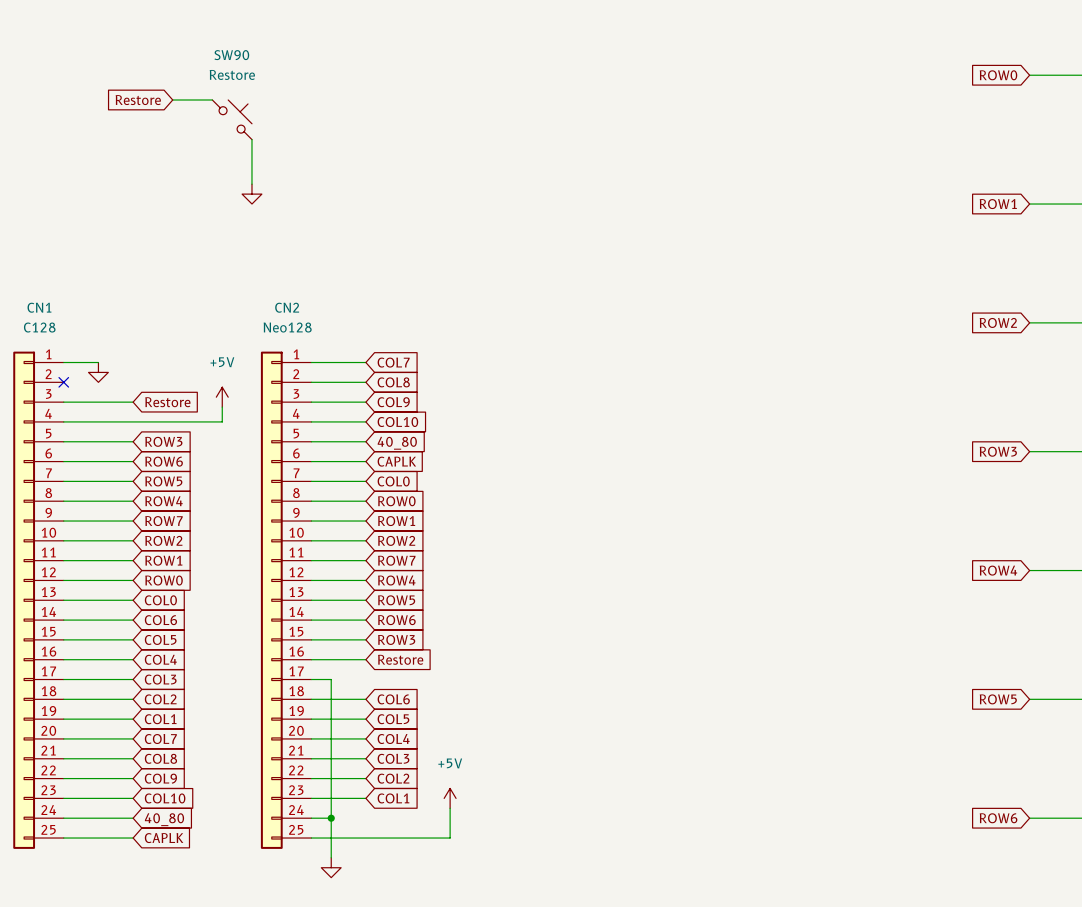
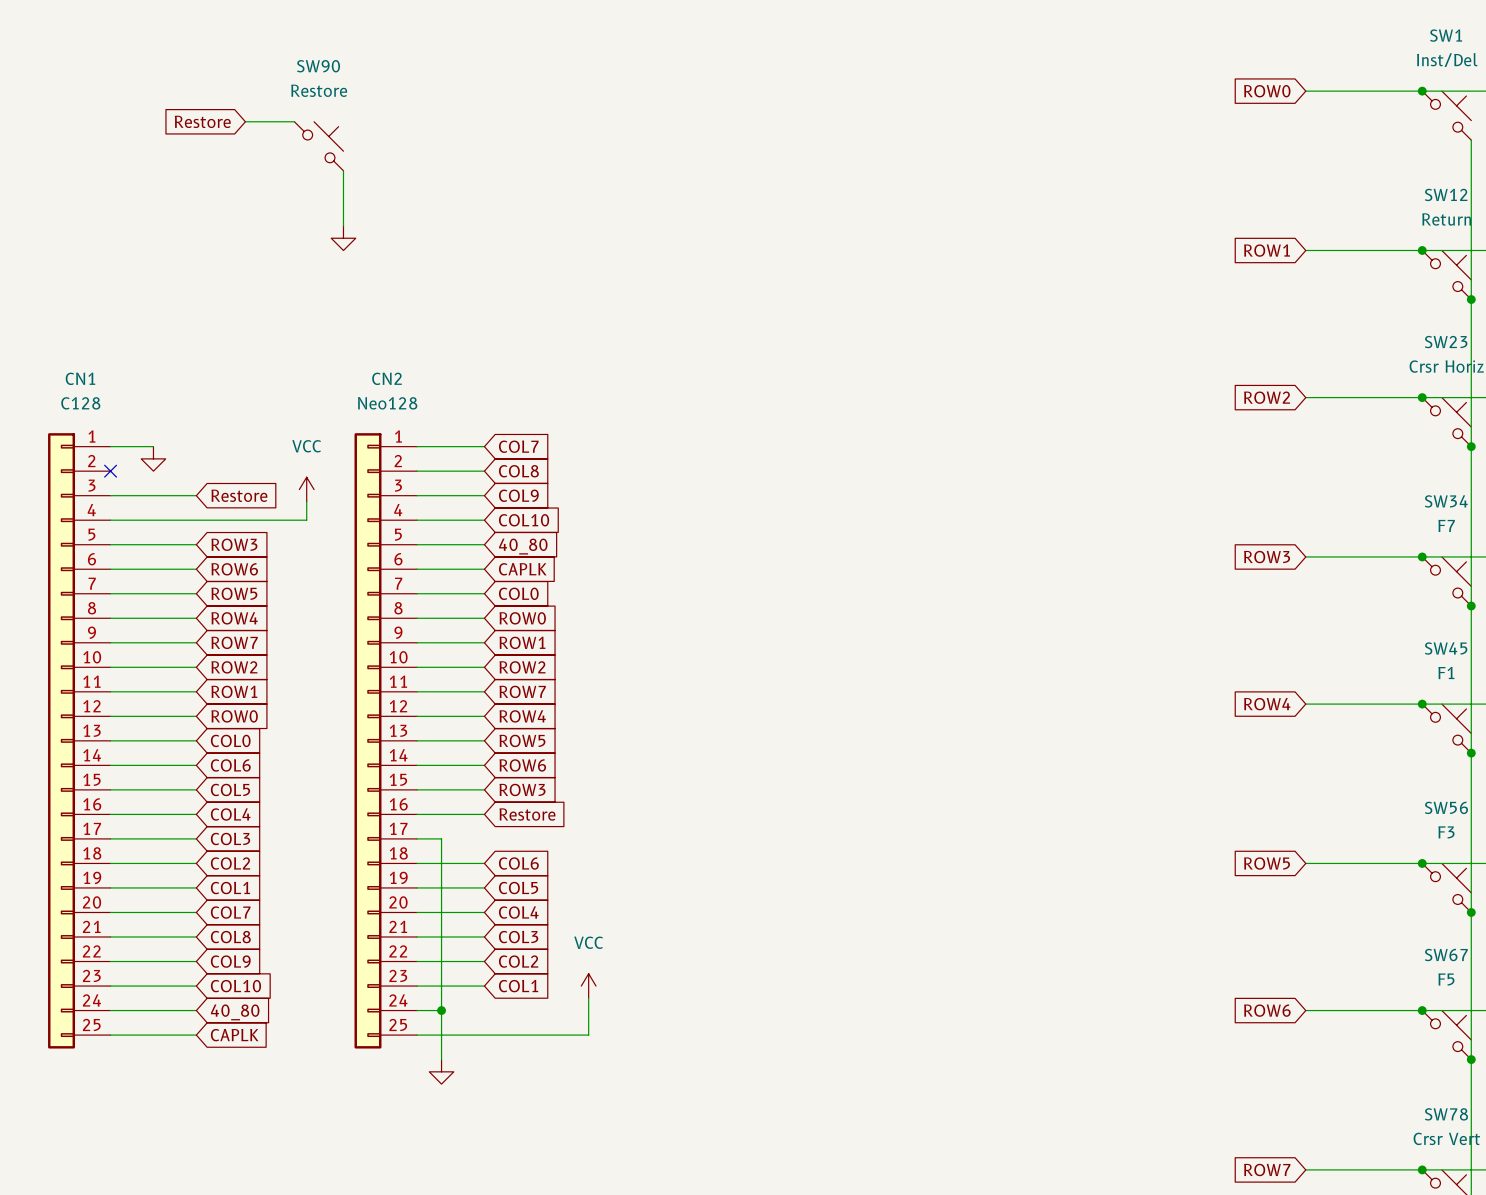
power symbol: +5V (222, 397) -> VCC (306, 489)
power symbol: +5V (450, 798) -> VCC (588, 986)

